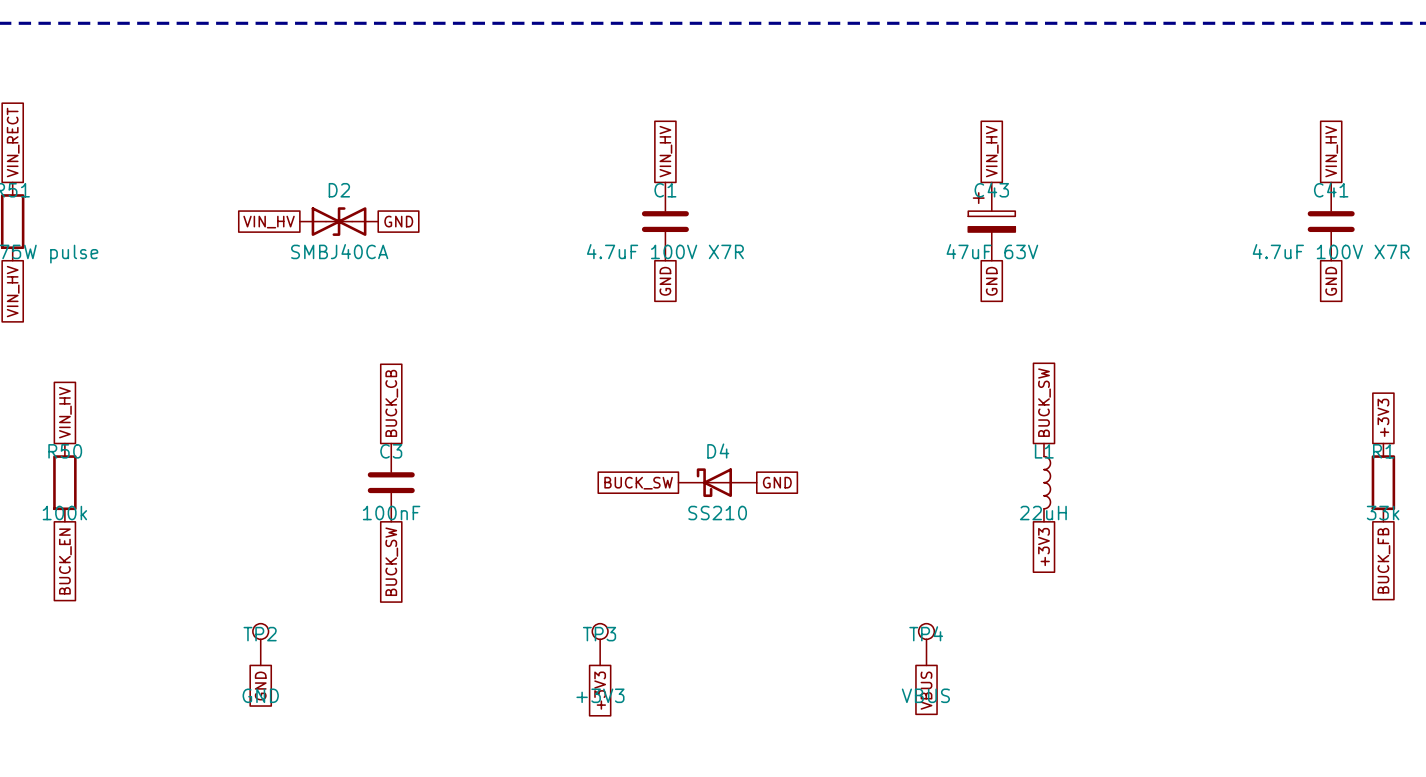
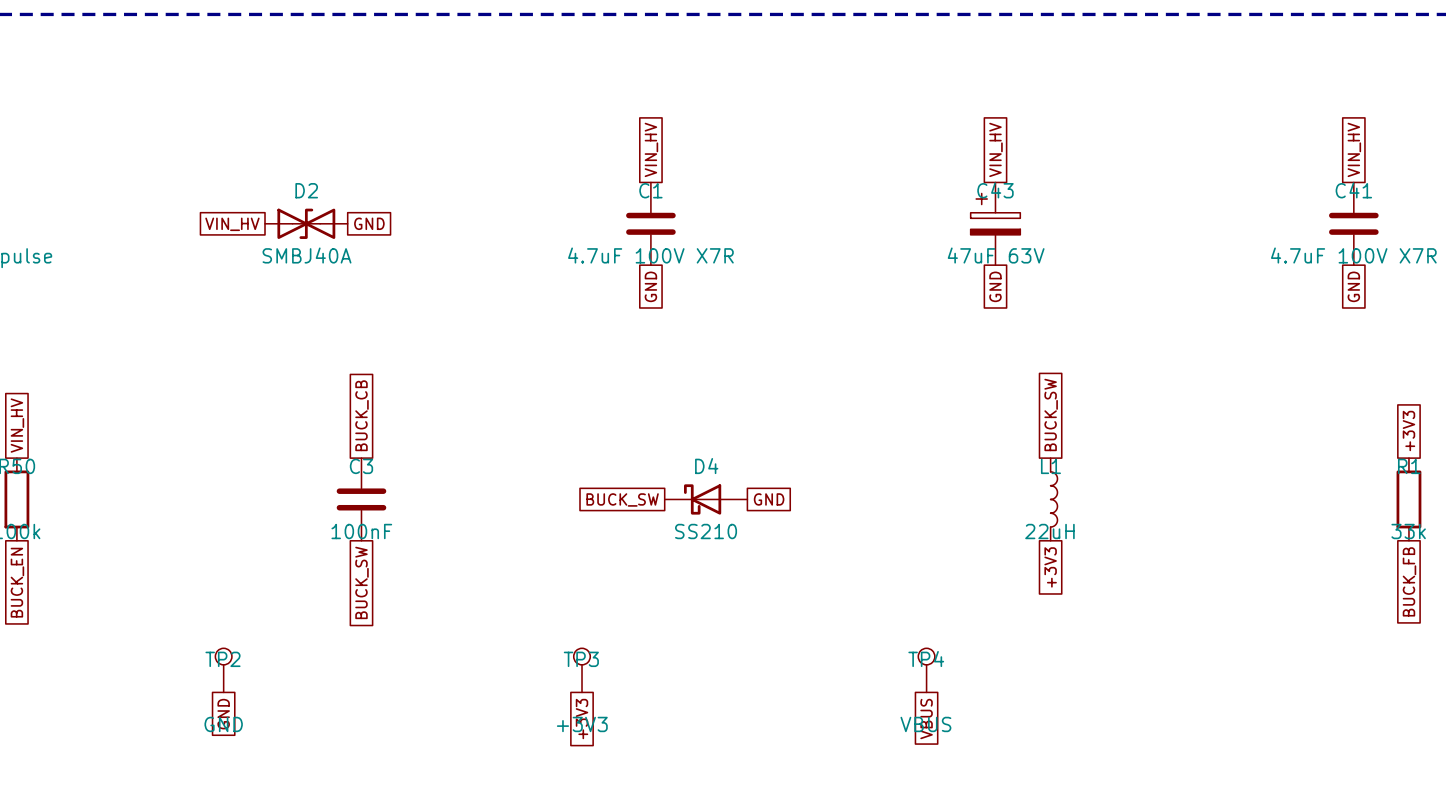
D2 value: SMBJ40CA (339, 251) -> SMBJ40A (307, 255)

